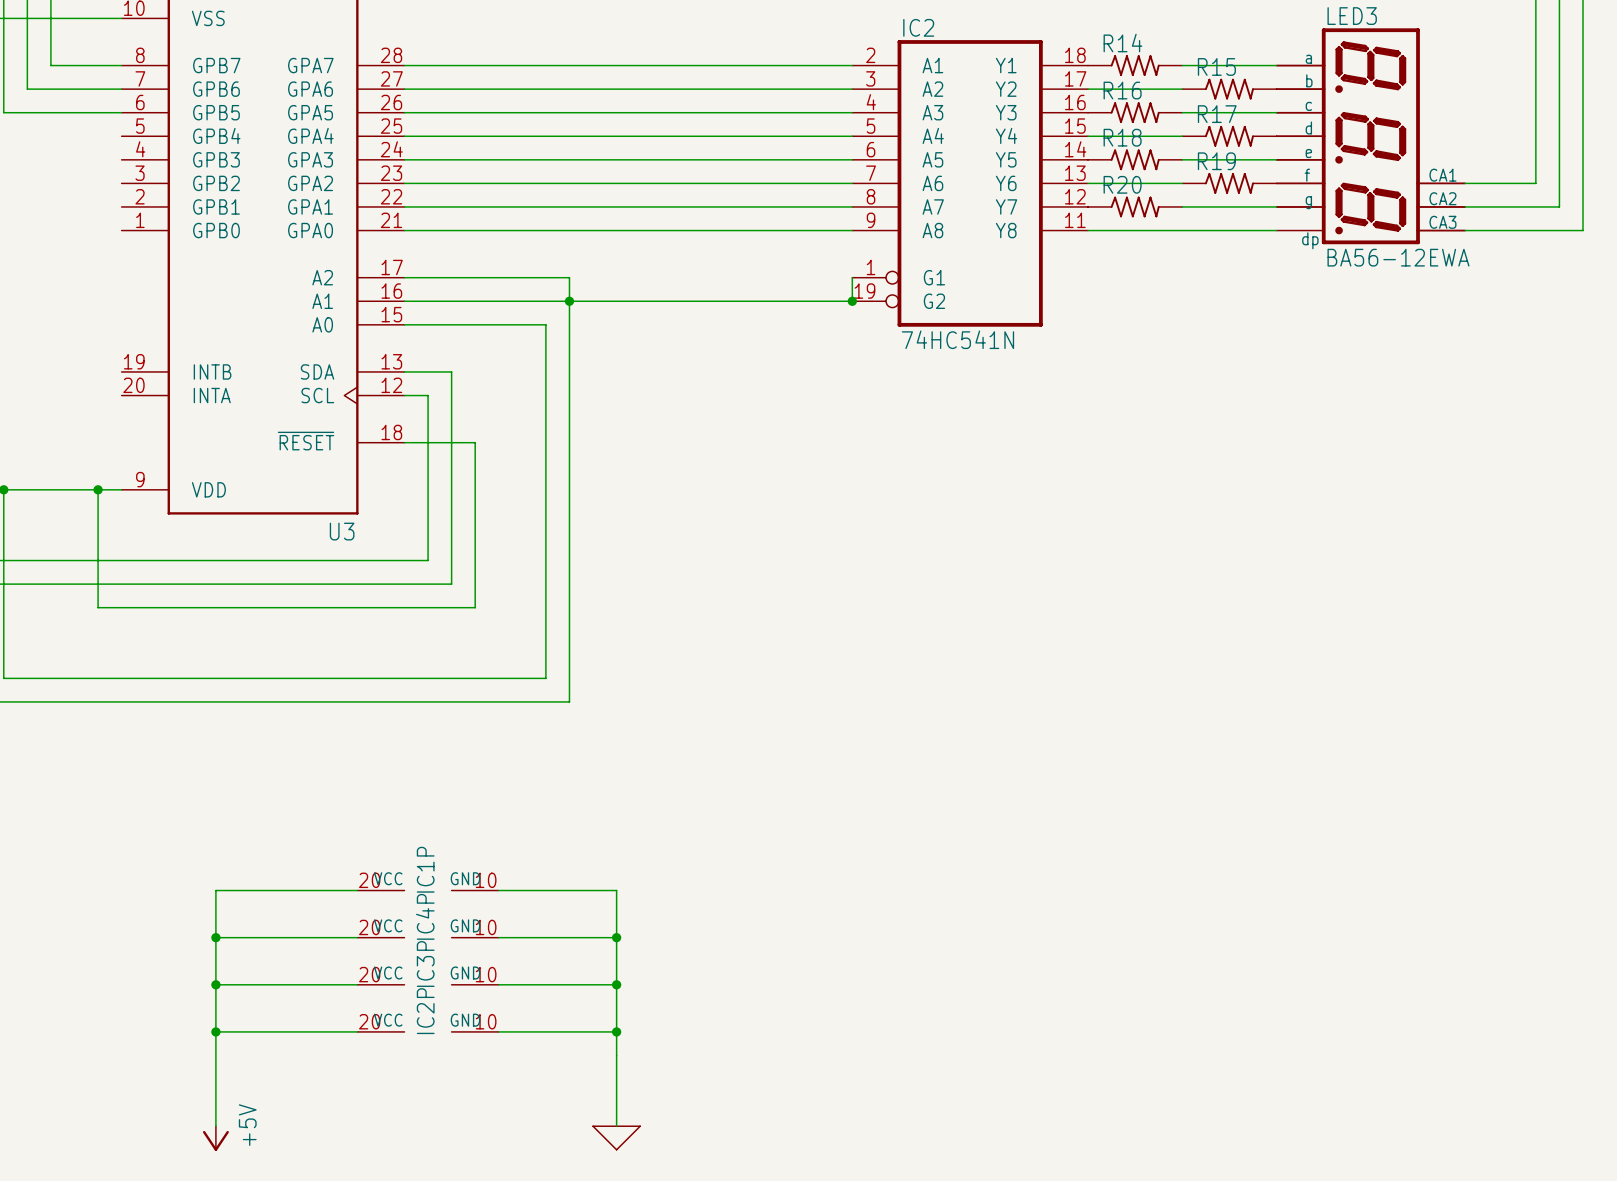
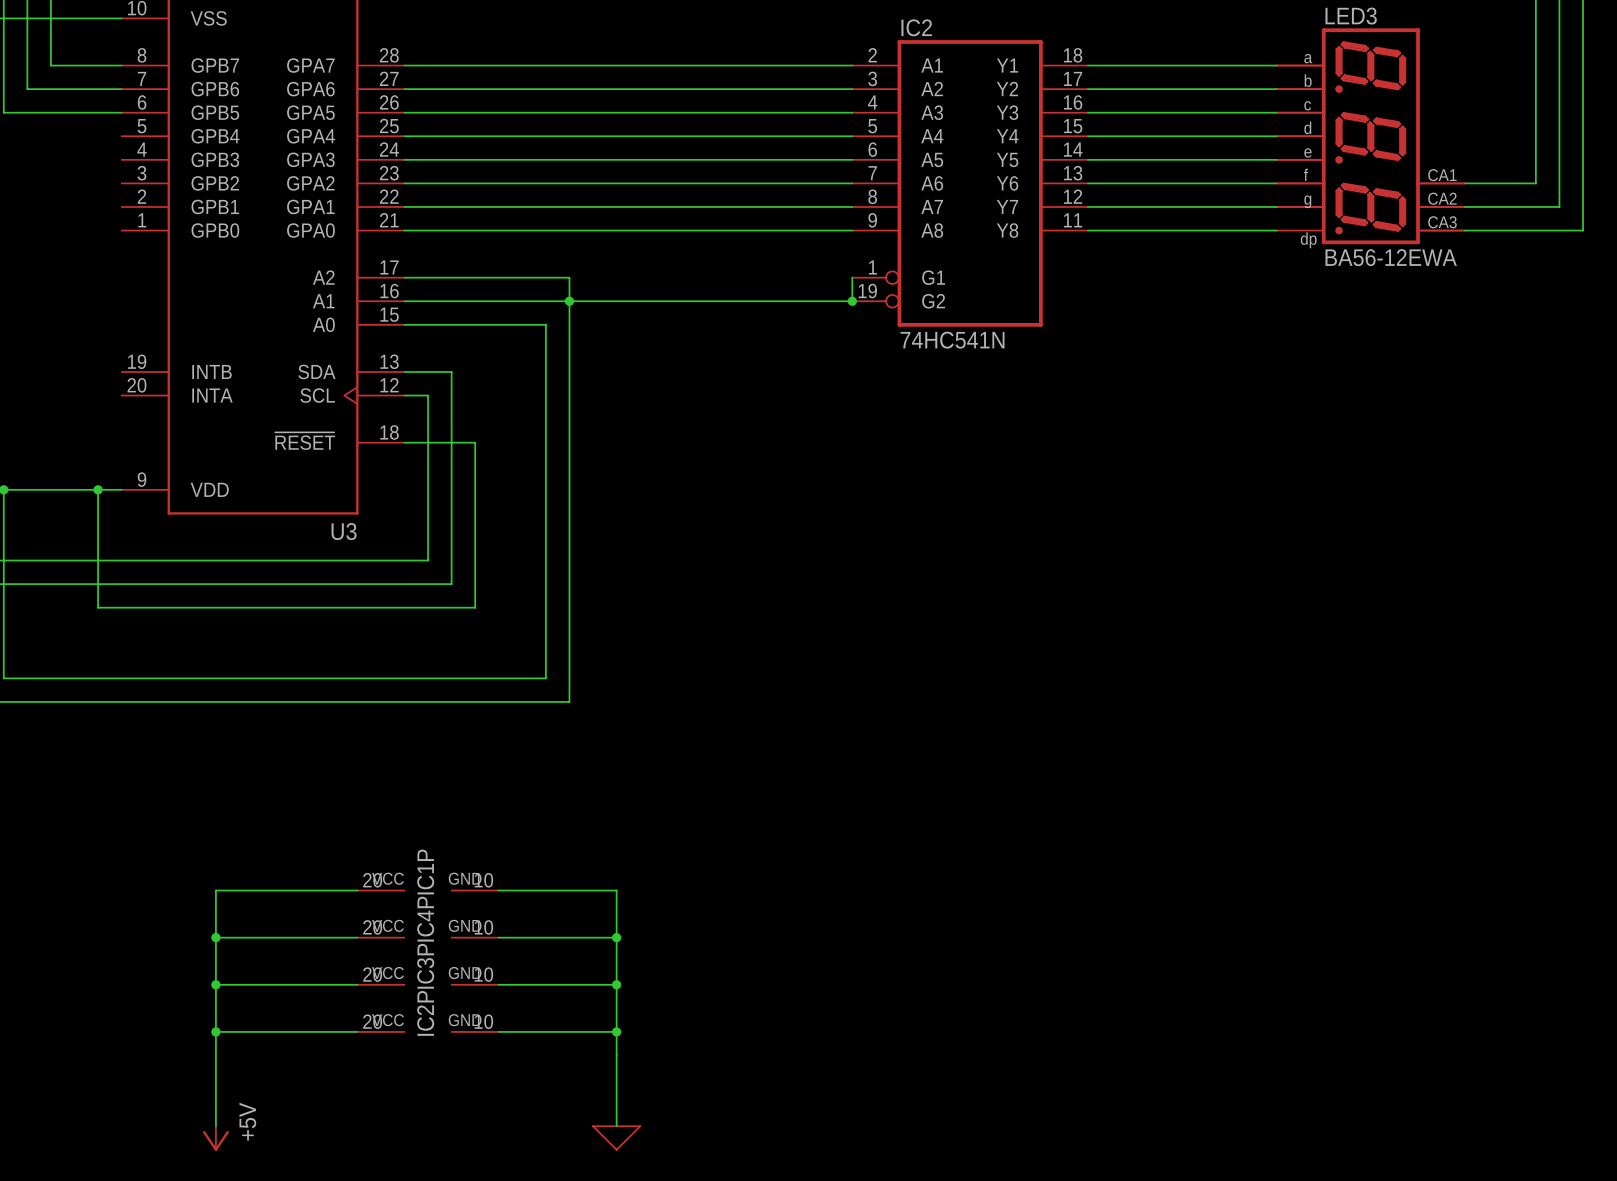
R14: (1135, 65) -> none
R15: (1229, 89) -> none
R16: (1135, 112) -> none
R17: (1229, 136) -> none
R18: (1135, 159) -> none
R19: (1229, 183) -> none
R20: (1135, 206) -> none

